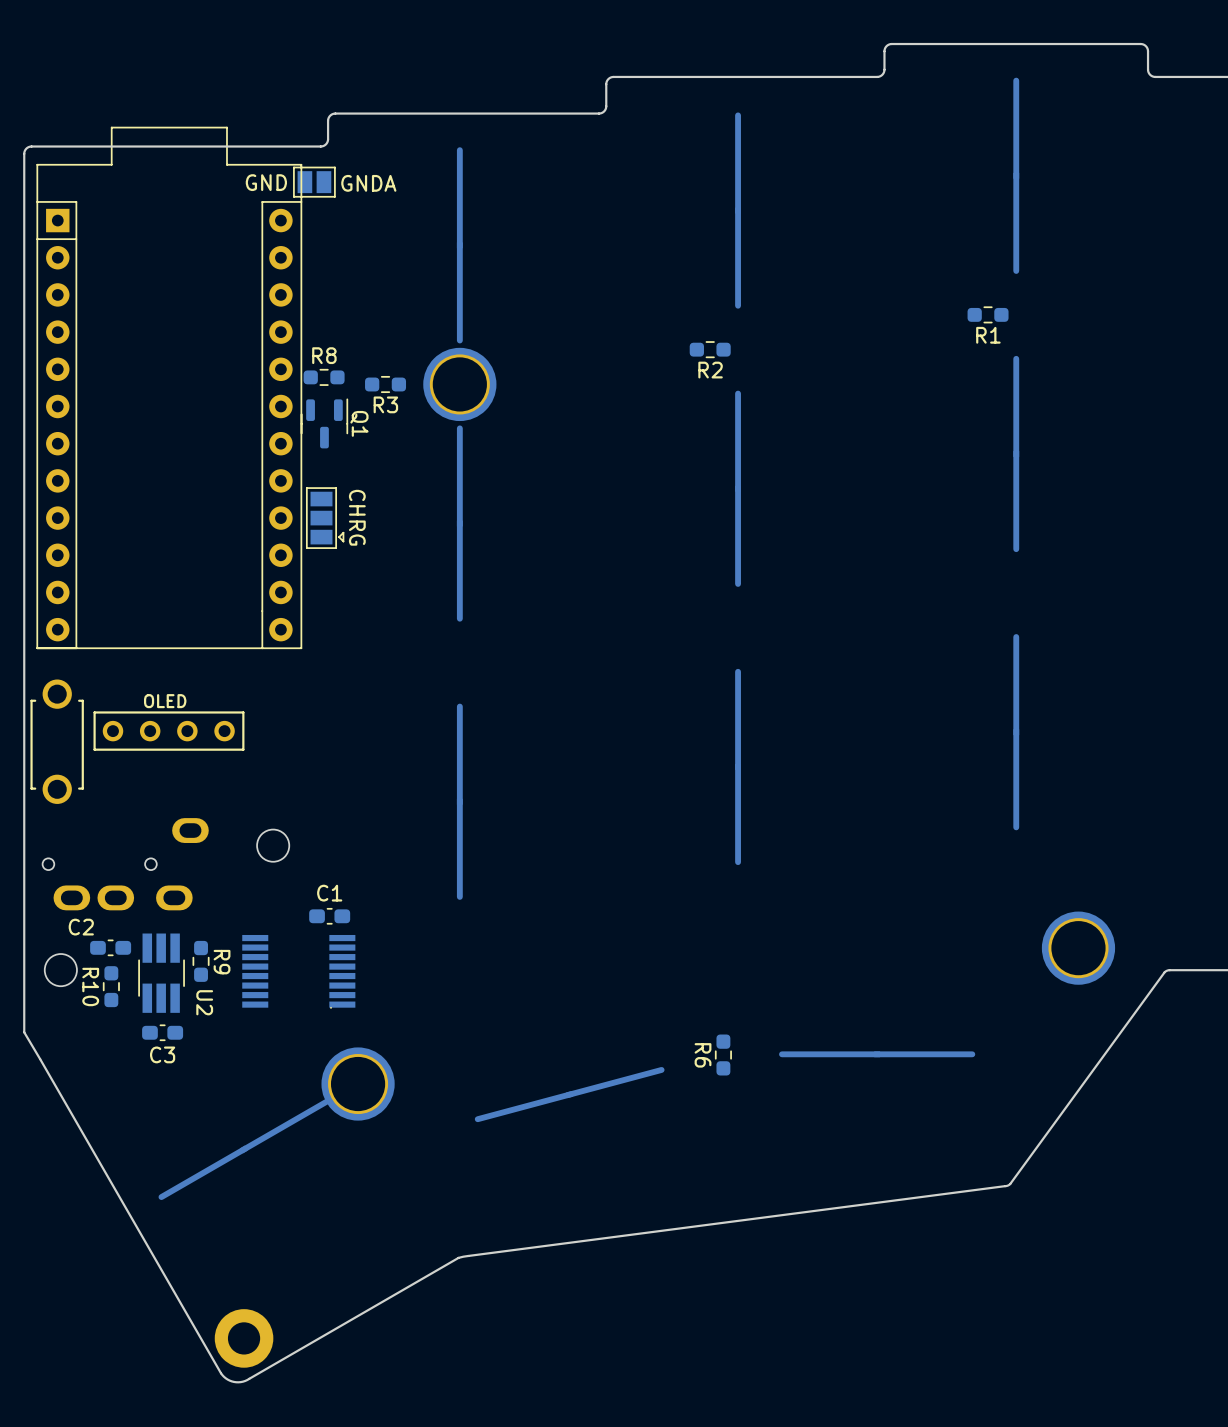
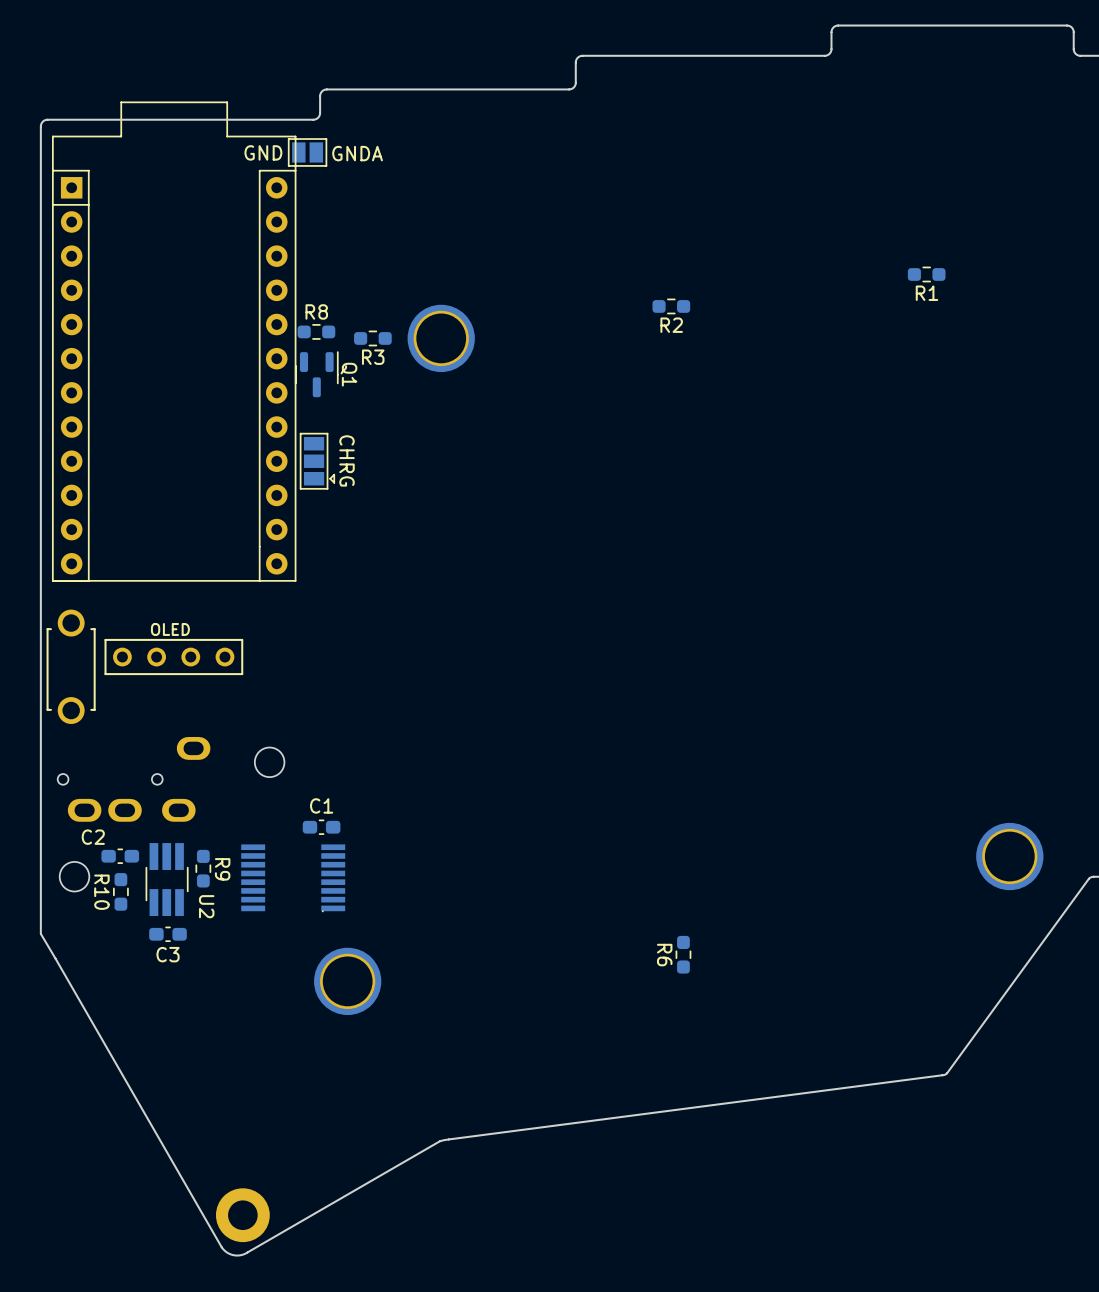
part: (1016, 175) -> none
part: (738, 210) -> none
part: (459, 245) -> none
part: (1016, 453) -> none
part: (738, 488) -> none
part: (459, 523) -> none
part: (1016, 732) -> none
part: (738, 766) -> none
part: (459, 801) -> none
part: (877, 1054) -> none
part: (569, 1094) -> none
part: (243, 1149) -> none

